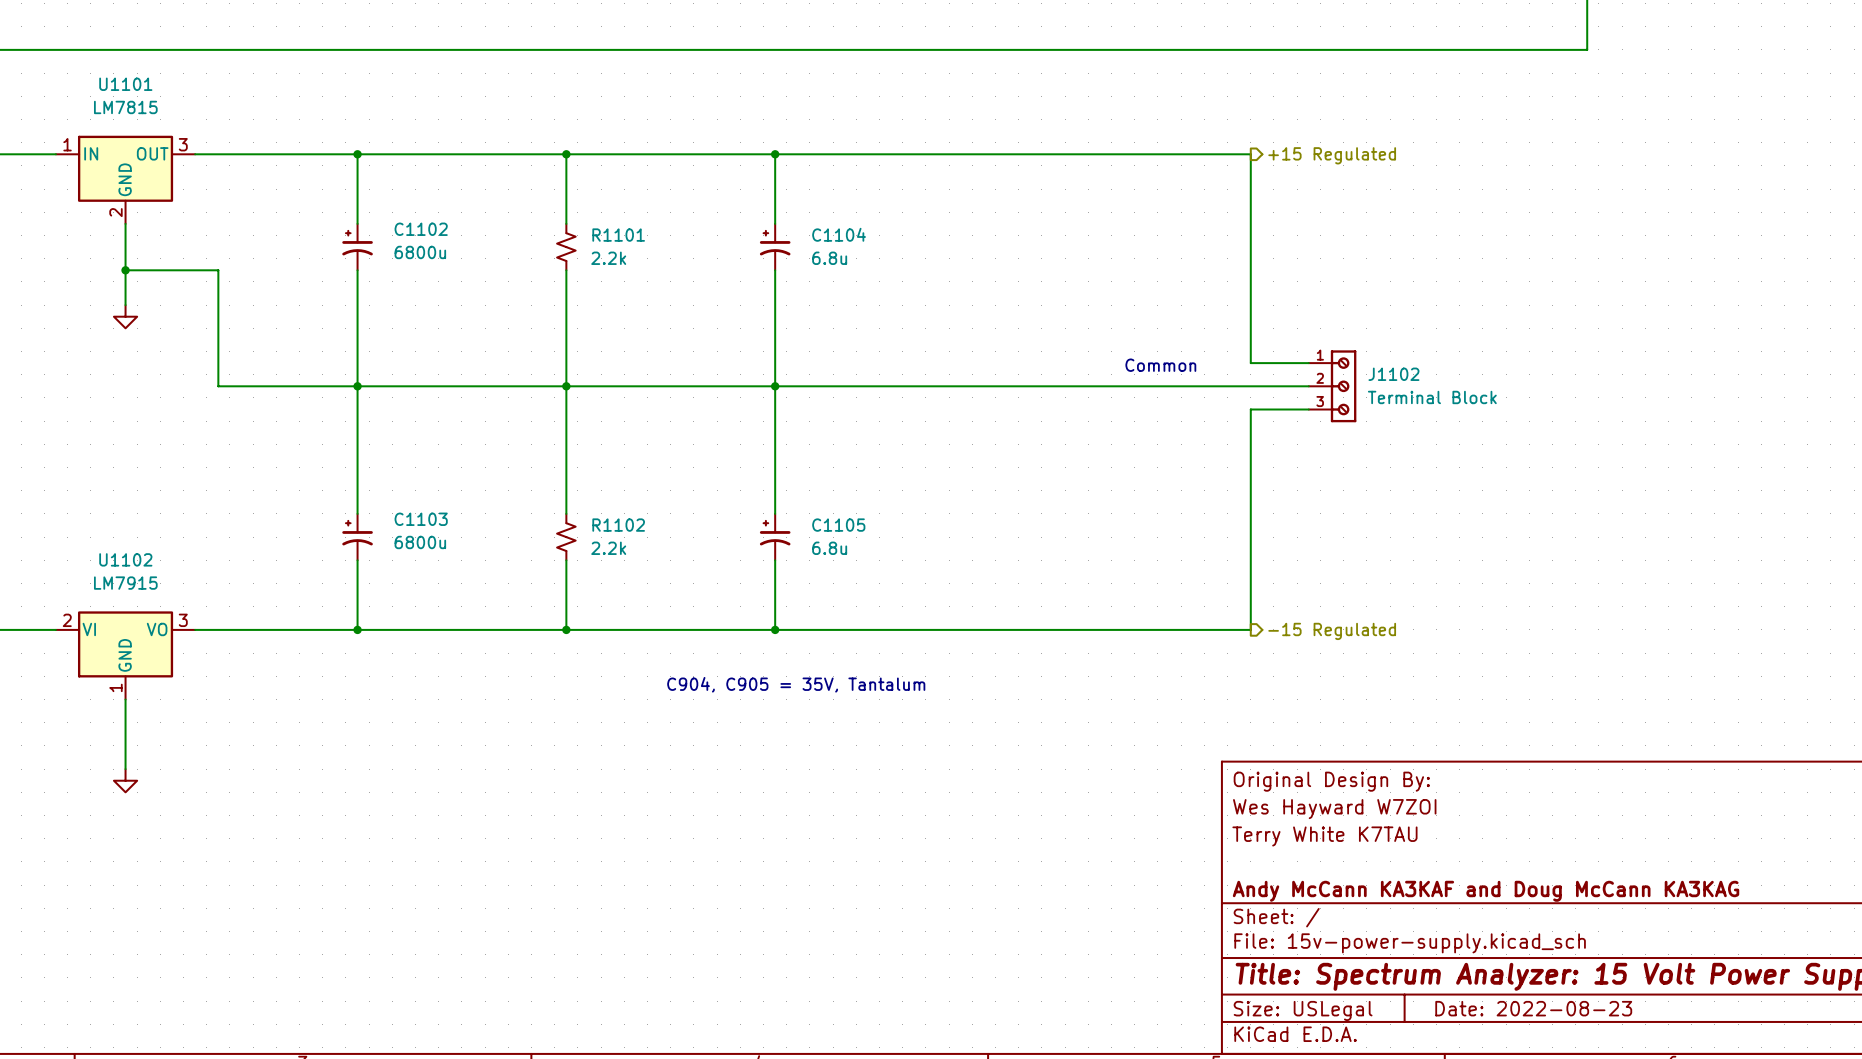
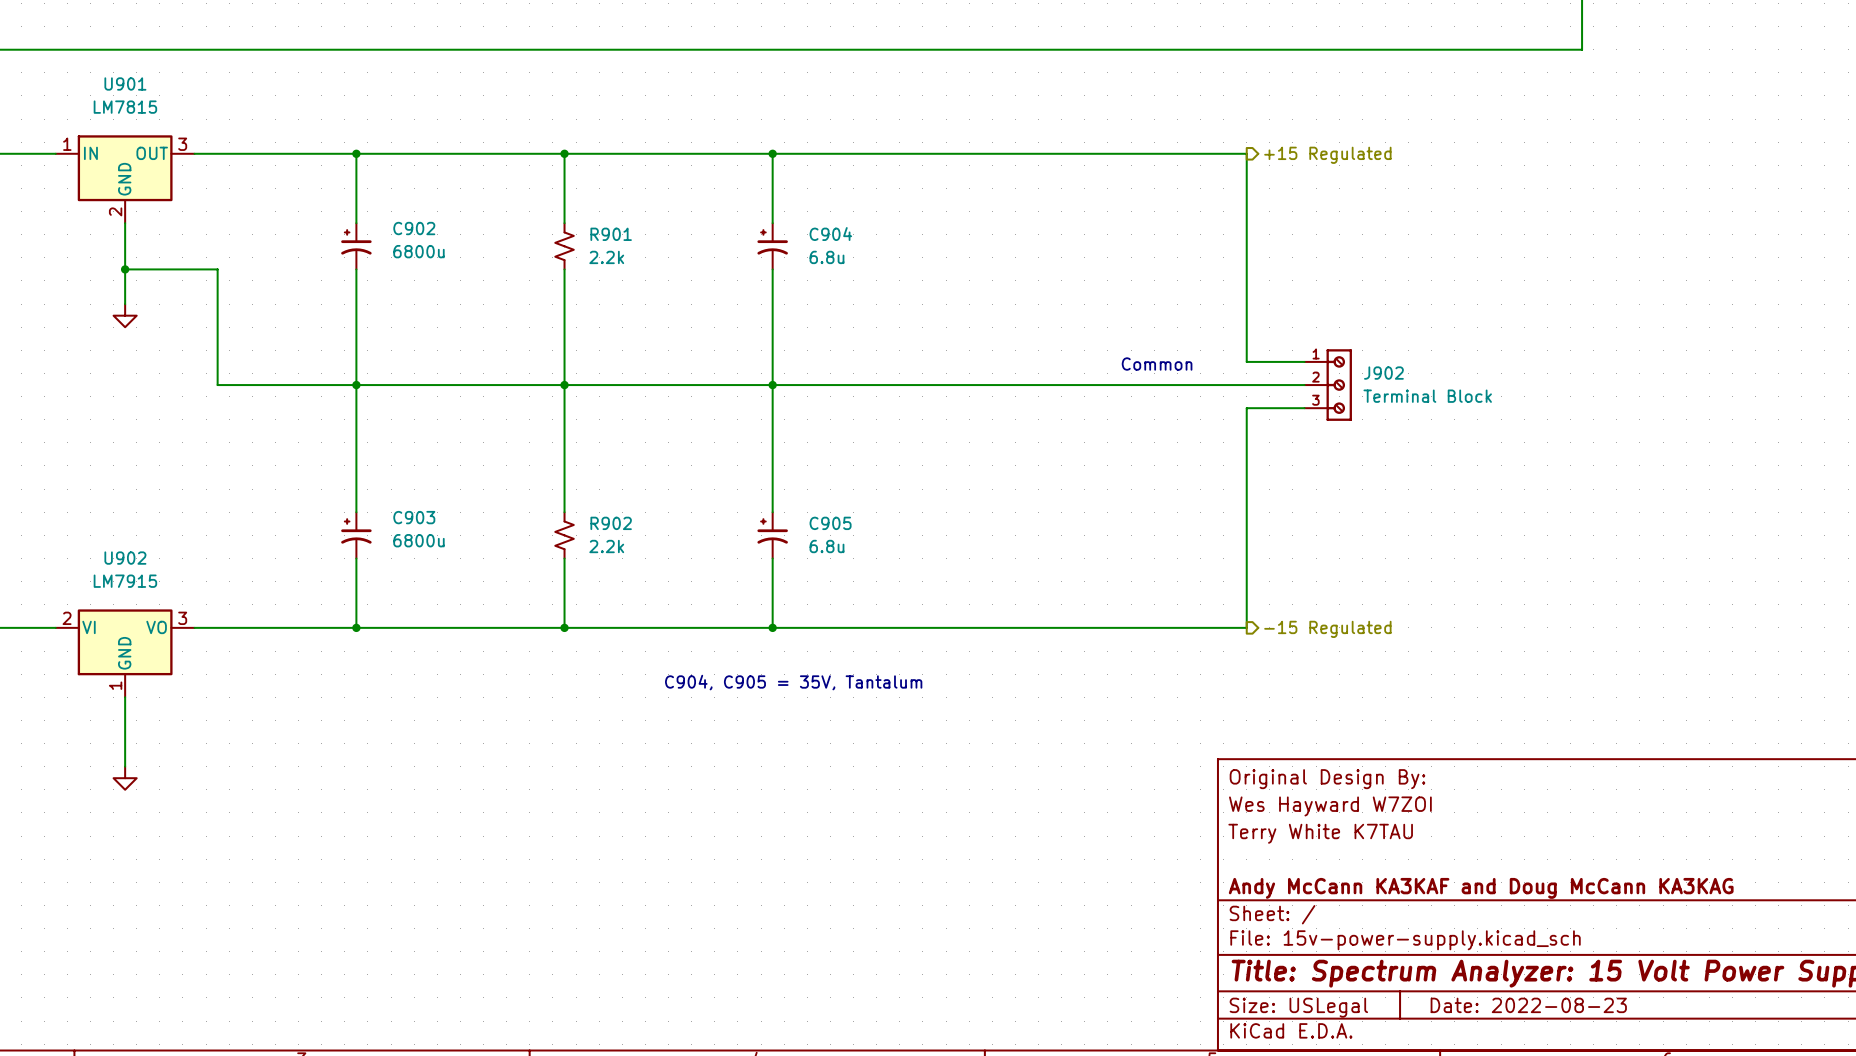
U1101 name: U1101 (125, 84) -> U901 (125, 83)
C1102 name: C1102 (421, 229) -> C902 (414, 228)
C1104 name: C1104 (839, 234) -> C904 (830, 234)
R1101 name: R1101 (618, 235) -> R901 (611, 234)
J1102 name: J1102 (1393, 374) -> J902 (1383, 373)
C1103 name: C1103 (421, 519) -> C903 (414, 517)
R1102 name: R1102 (618, 525) -> R902 (611, 523)
C1105 name: C1105 (838, 525) -> C905 (830, 523)
U1102 name: U1102 (125, 559) -> U902 (125, 558)

